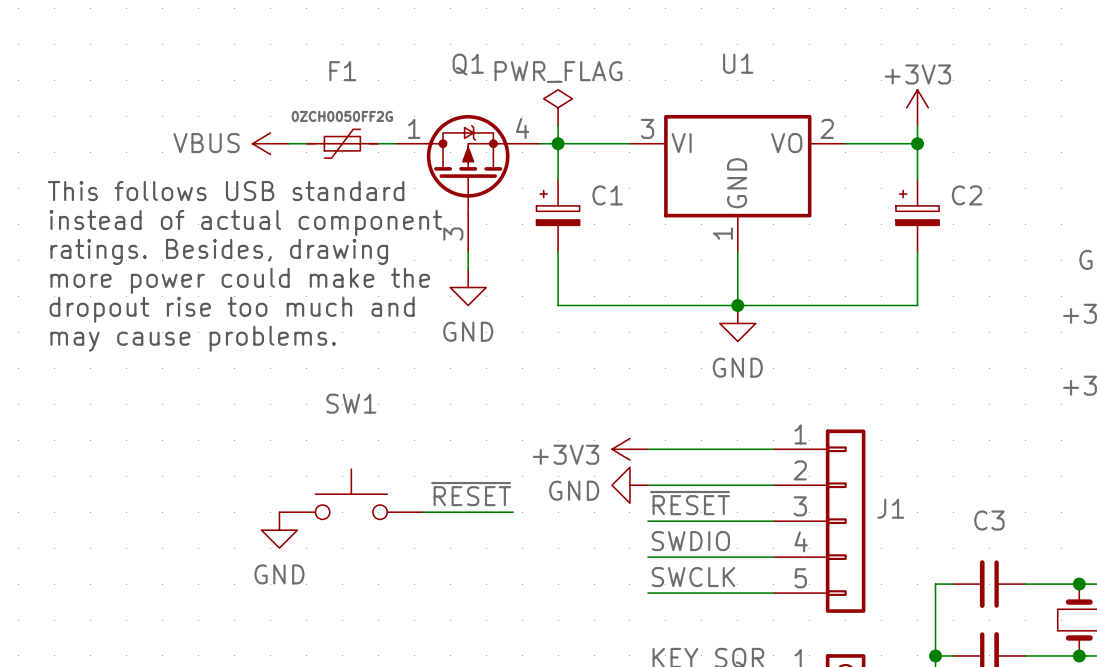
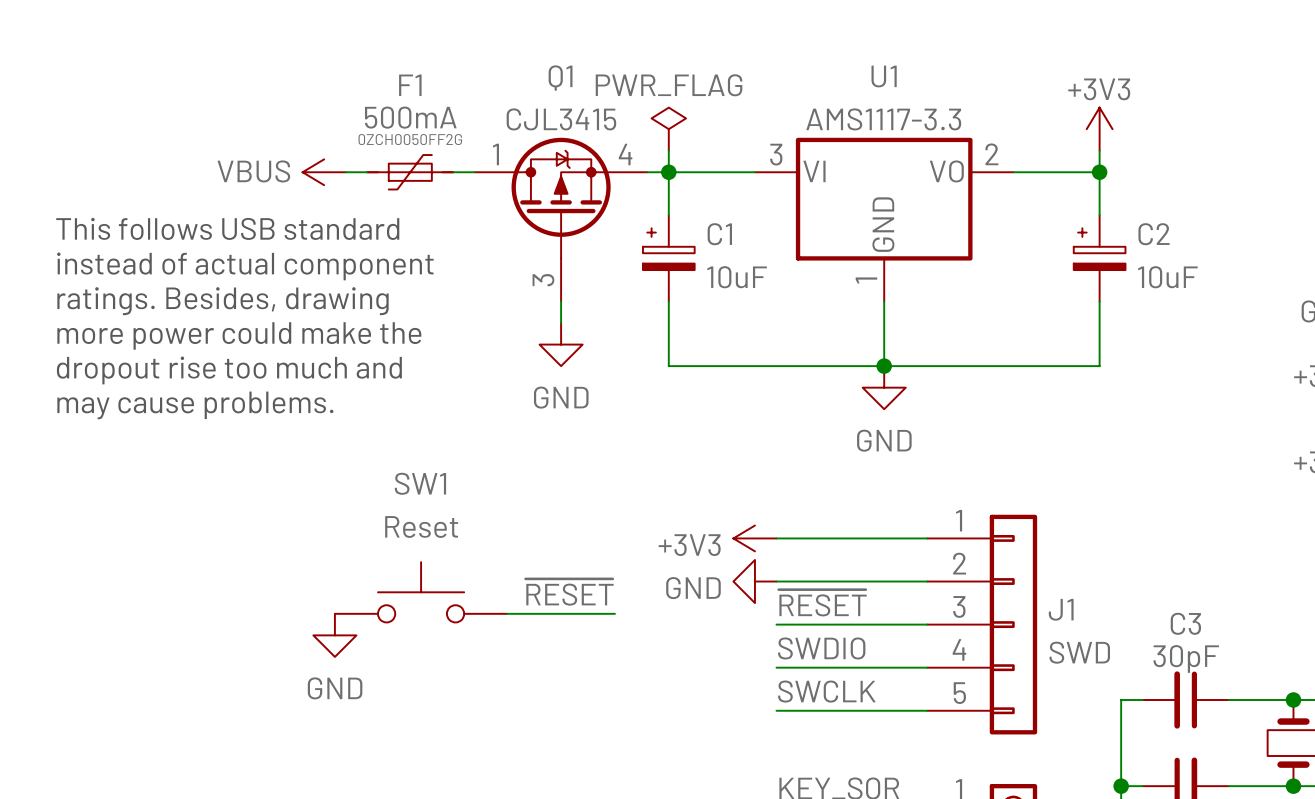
F1 value: none -> 500mA (410, 117)
Q1 value: none -> CJL3415 (561, 119)
U1 value: none -> AMS1117-3.3 (883, 119)
C1 value: none -> 10uF (737, 277)
C2 value: none -> 10uF (1167, 277)
SW1 value: none -> Reset (421, 527)
J1 value: none -> SWD (1079, 652)
C3 value: none -> 30pF (1186, 658)

